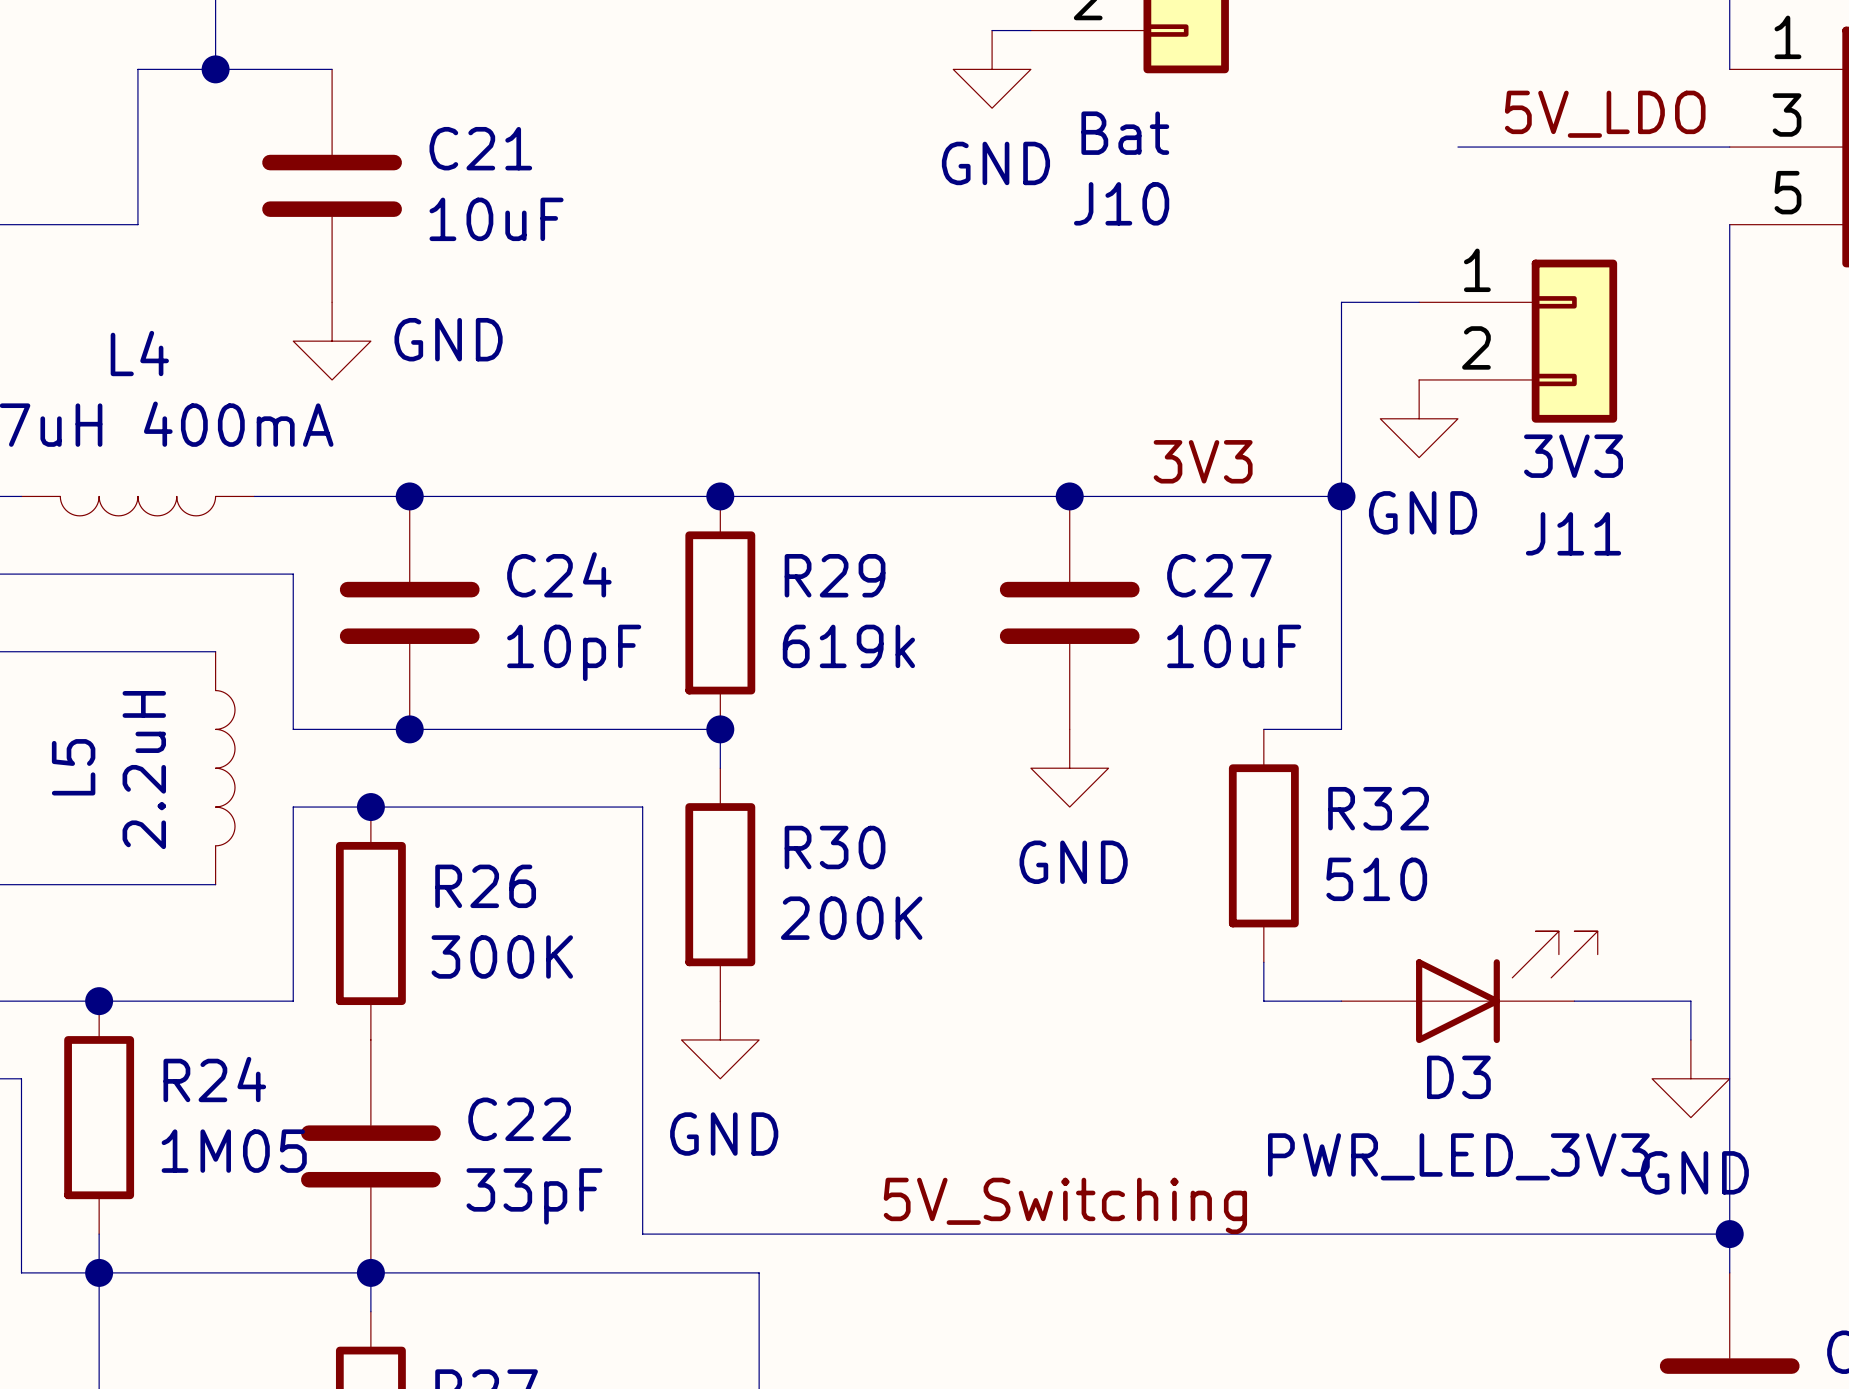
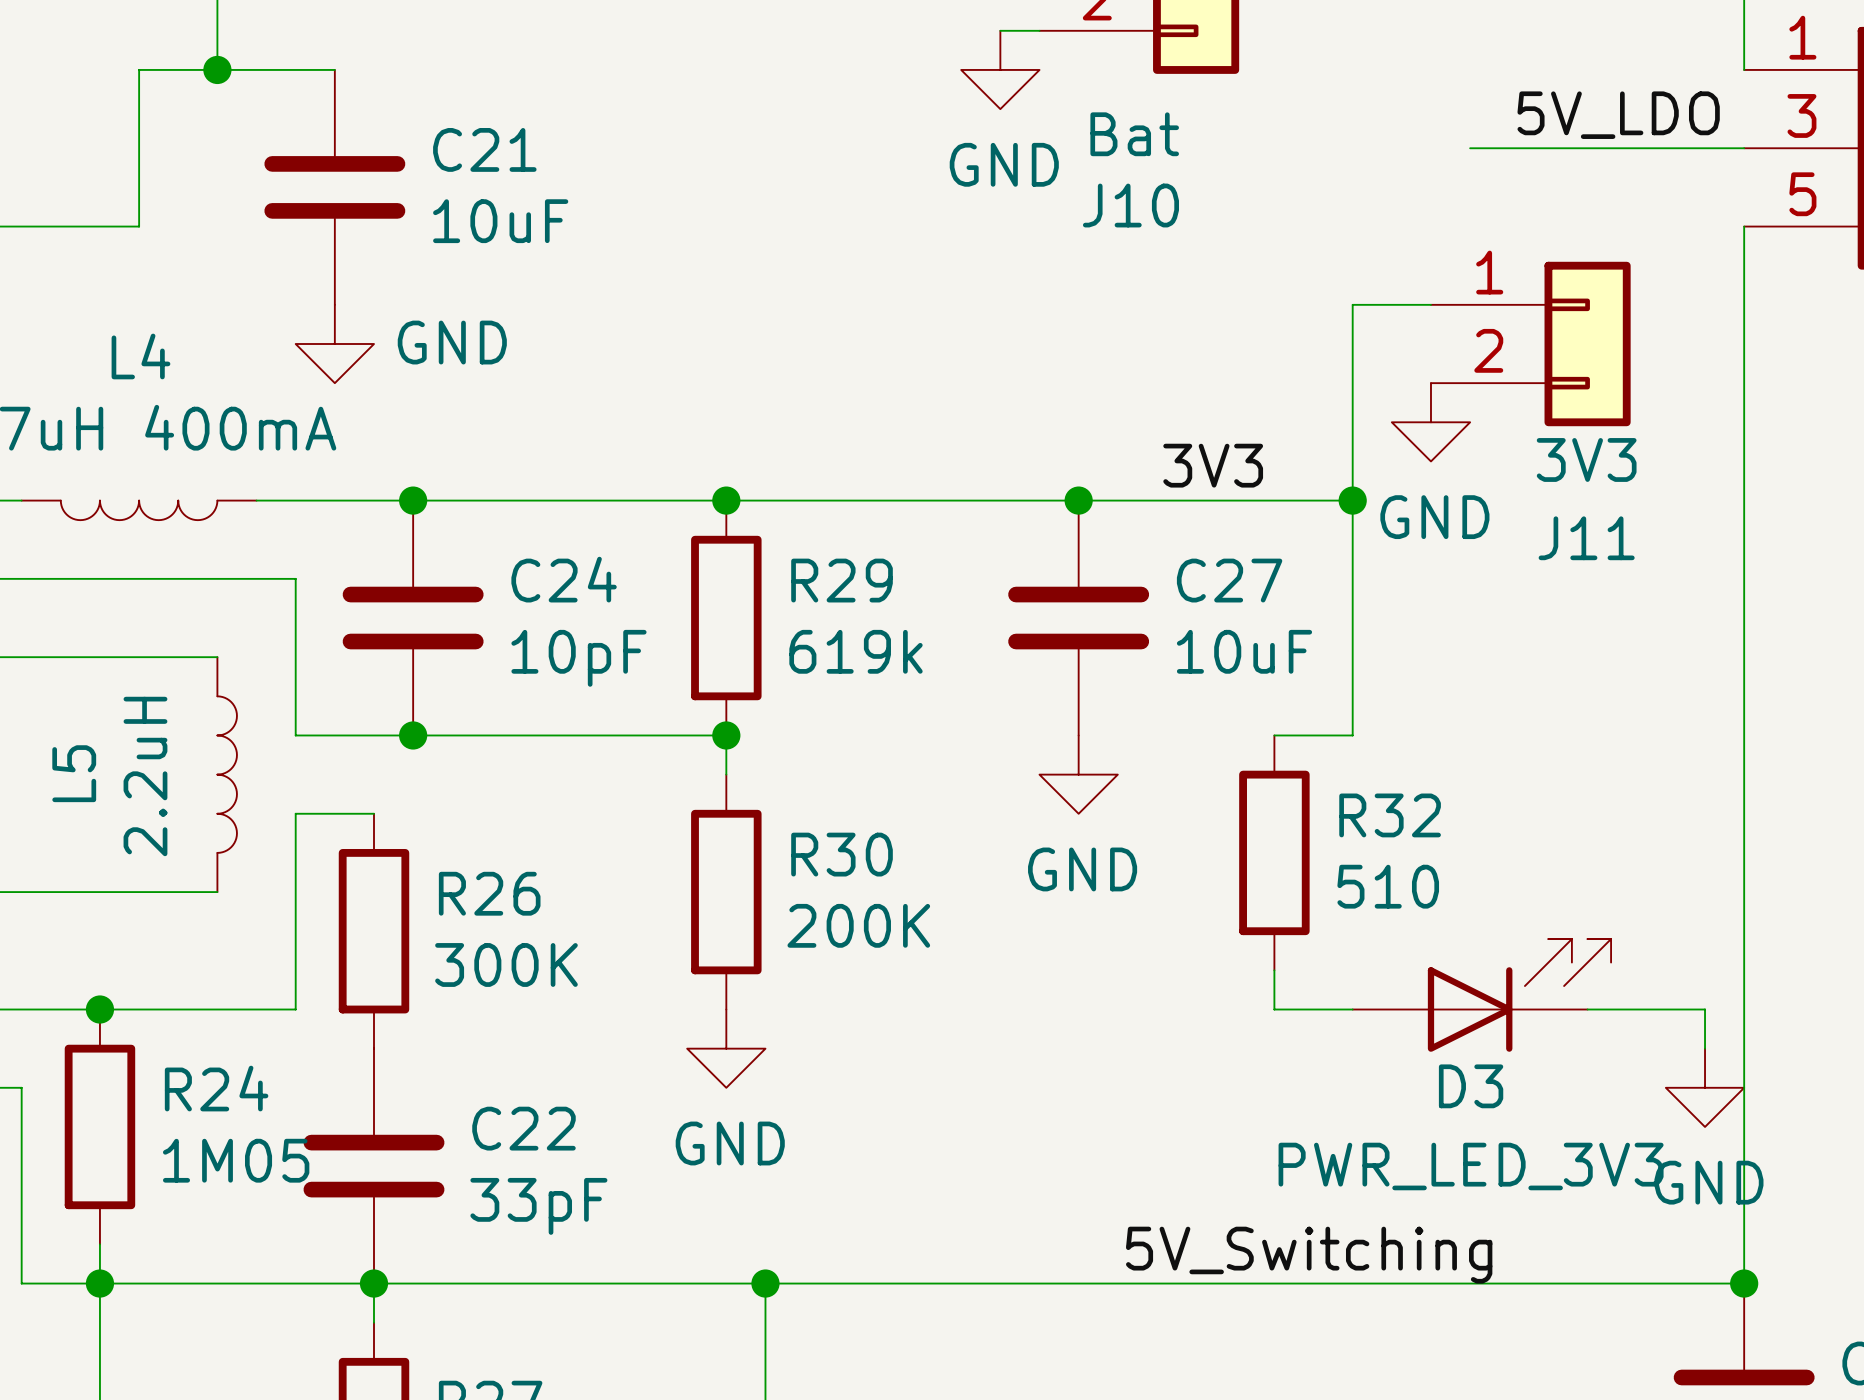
wire: (370, 807) (642, 807) (642, 1234) (1729, 1234) -> none
junction: (370, 807) -> none
label position: 5V_Switching (1065, 1205) -> 5V_Switching (1309, 1255)
junction position: (1729, 1234) -> (1744, 1283)
wire: none -> (765, 1283) (1744, 1283)
junction: none -> (765, 1283)

